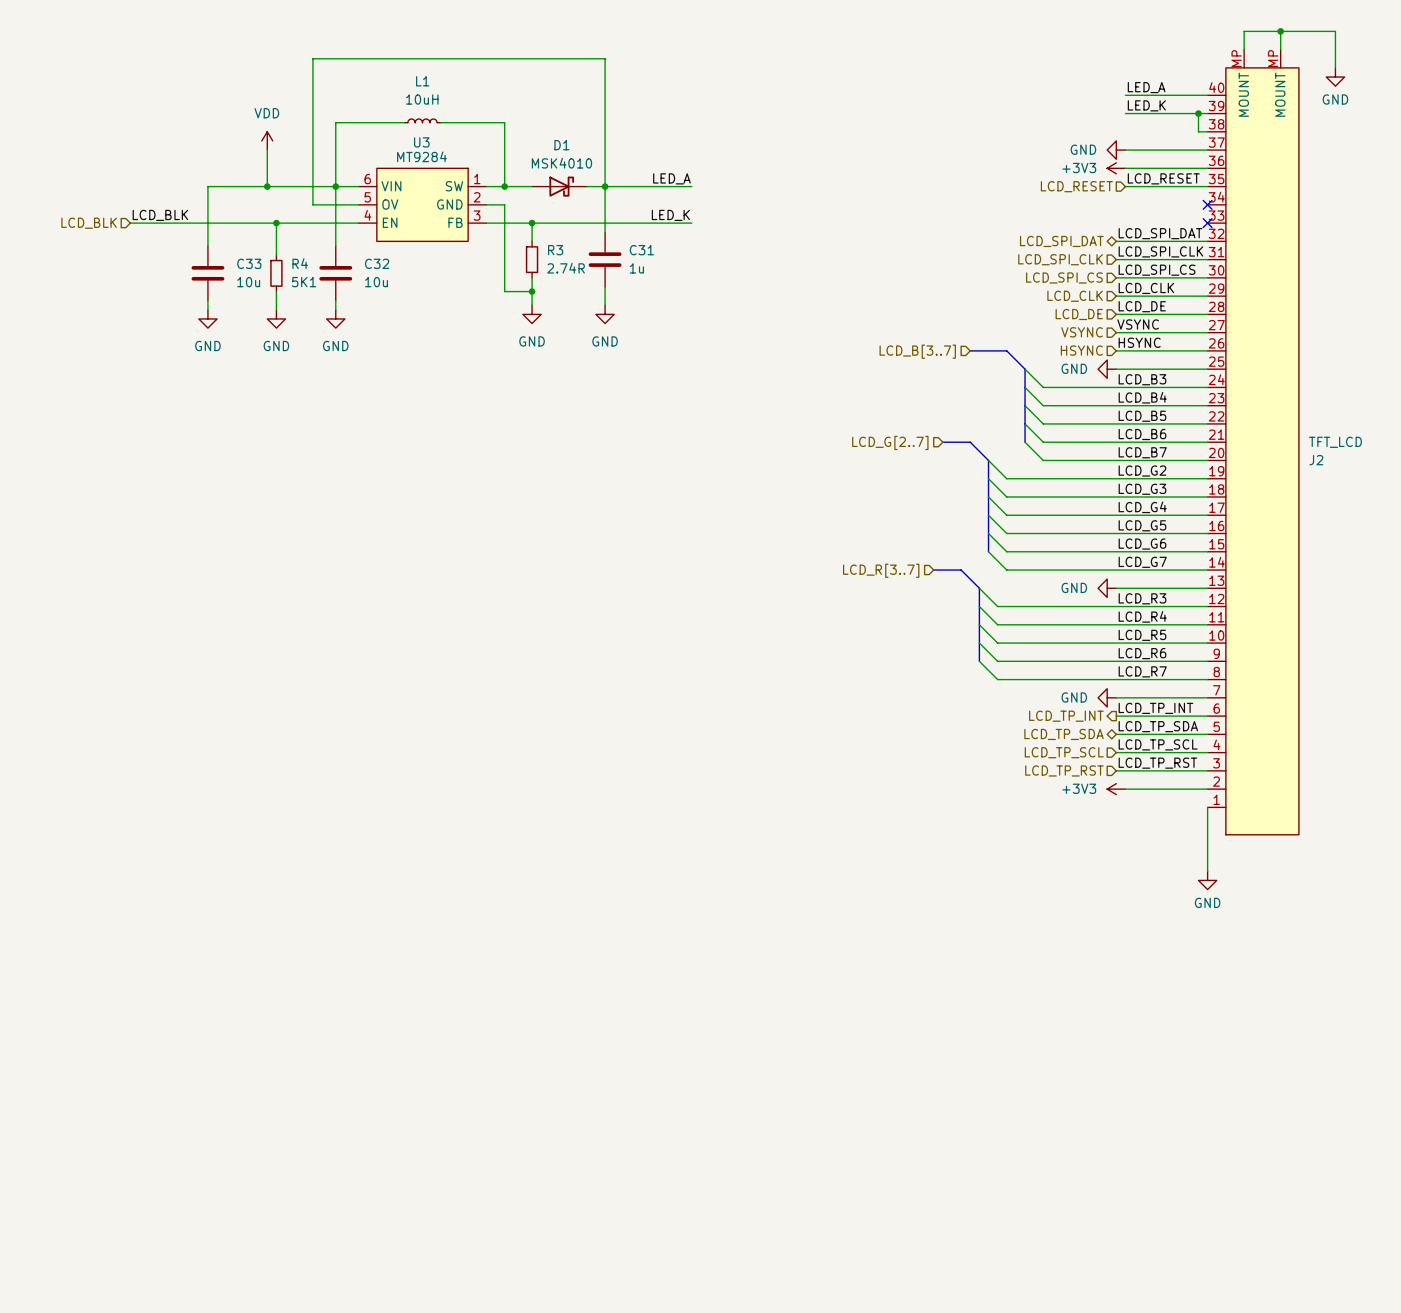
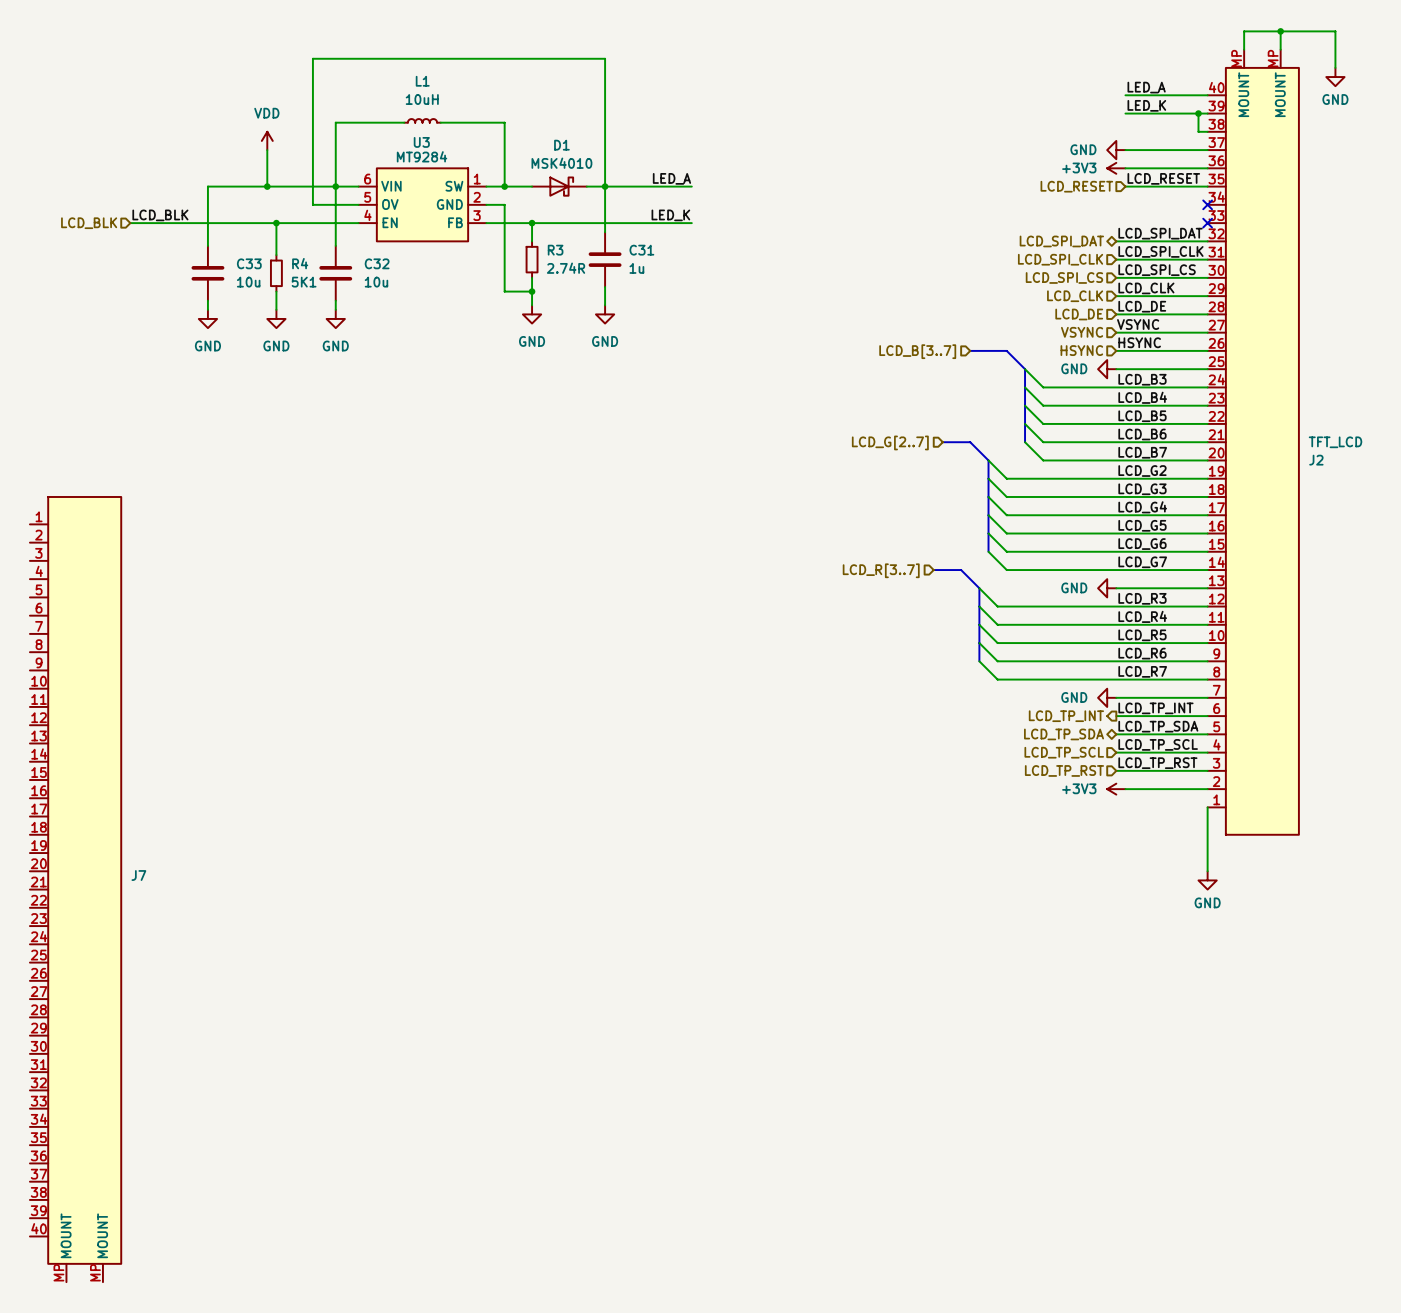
J7: none -> (75, 889)

